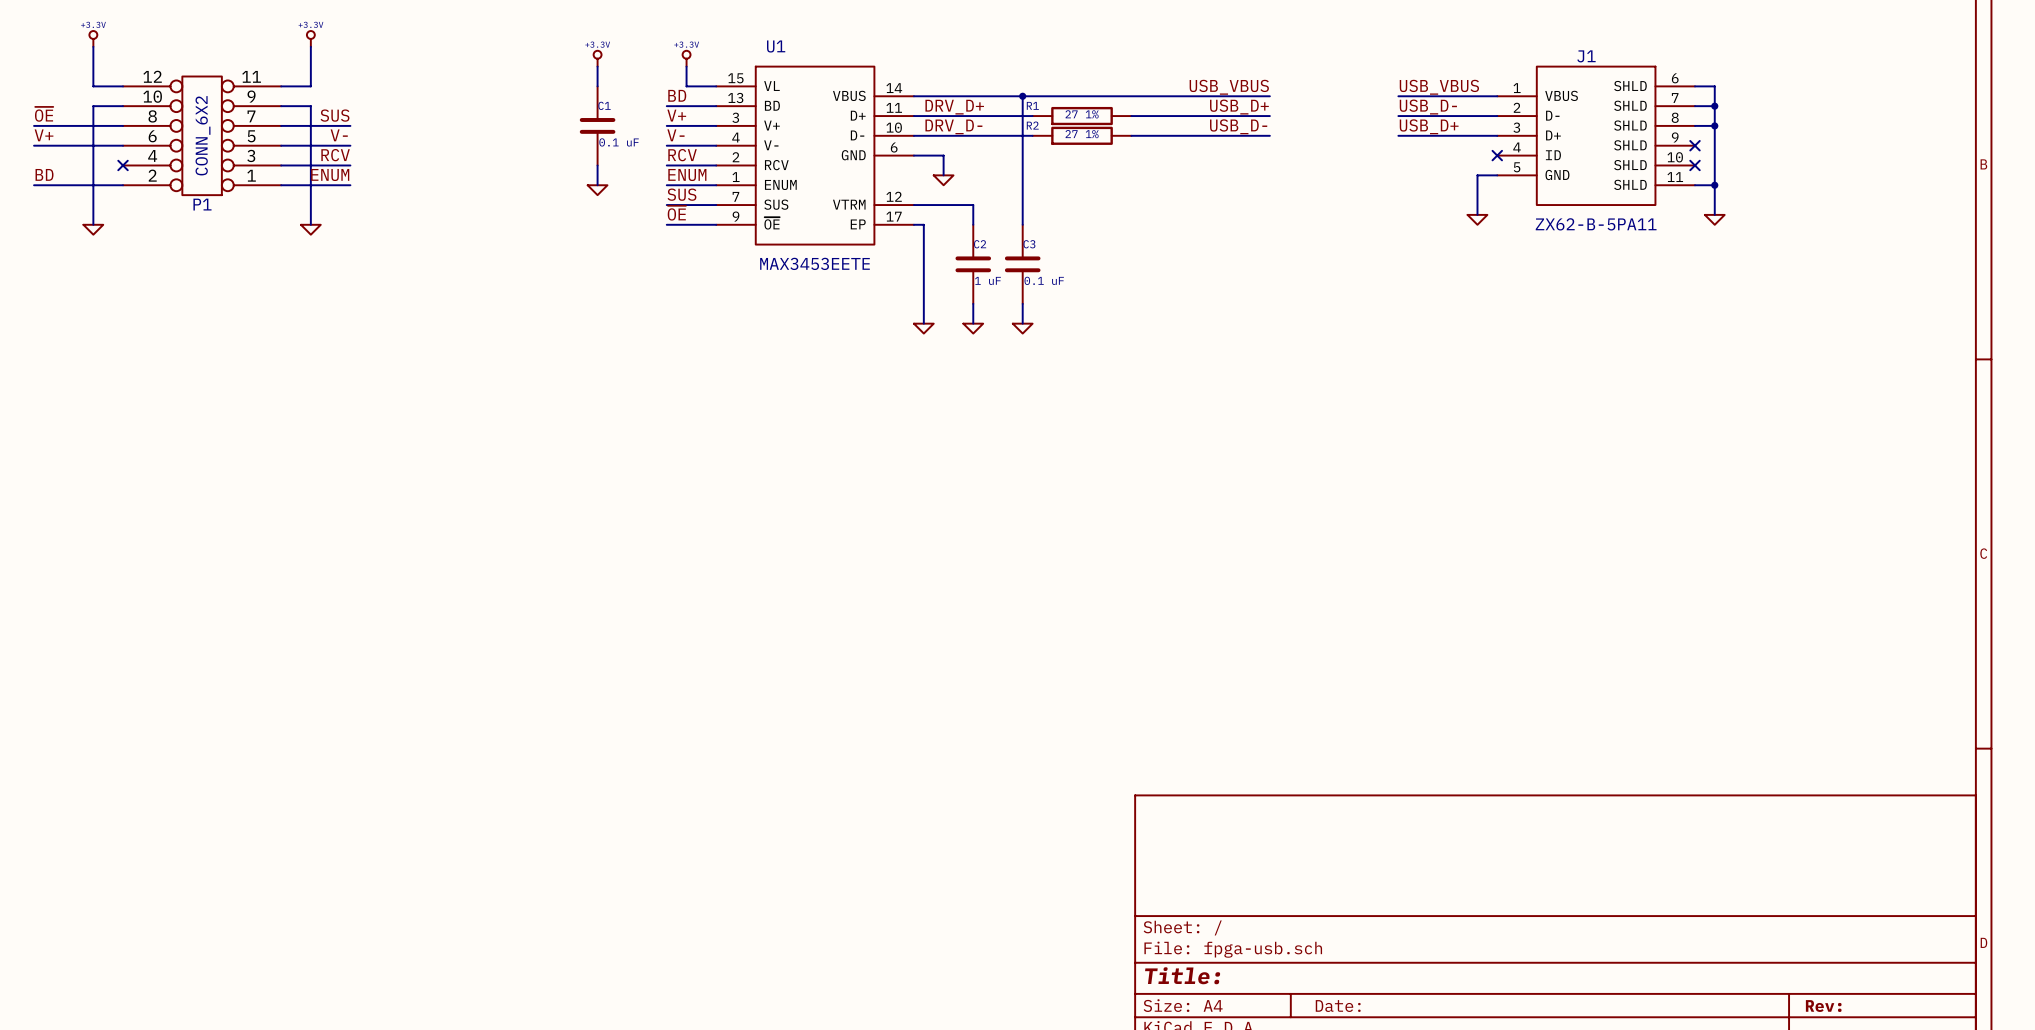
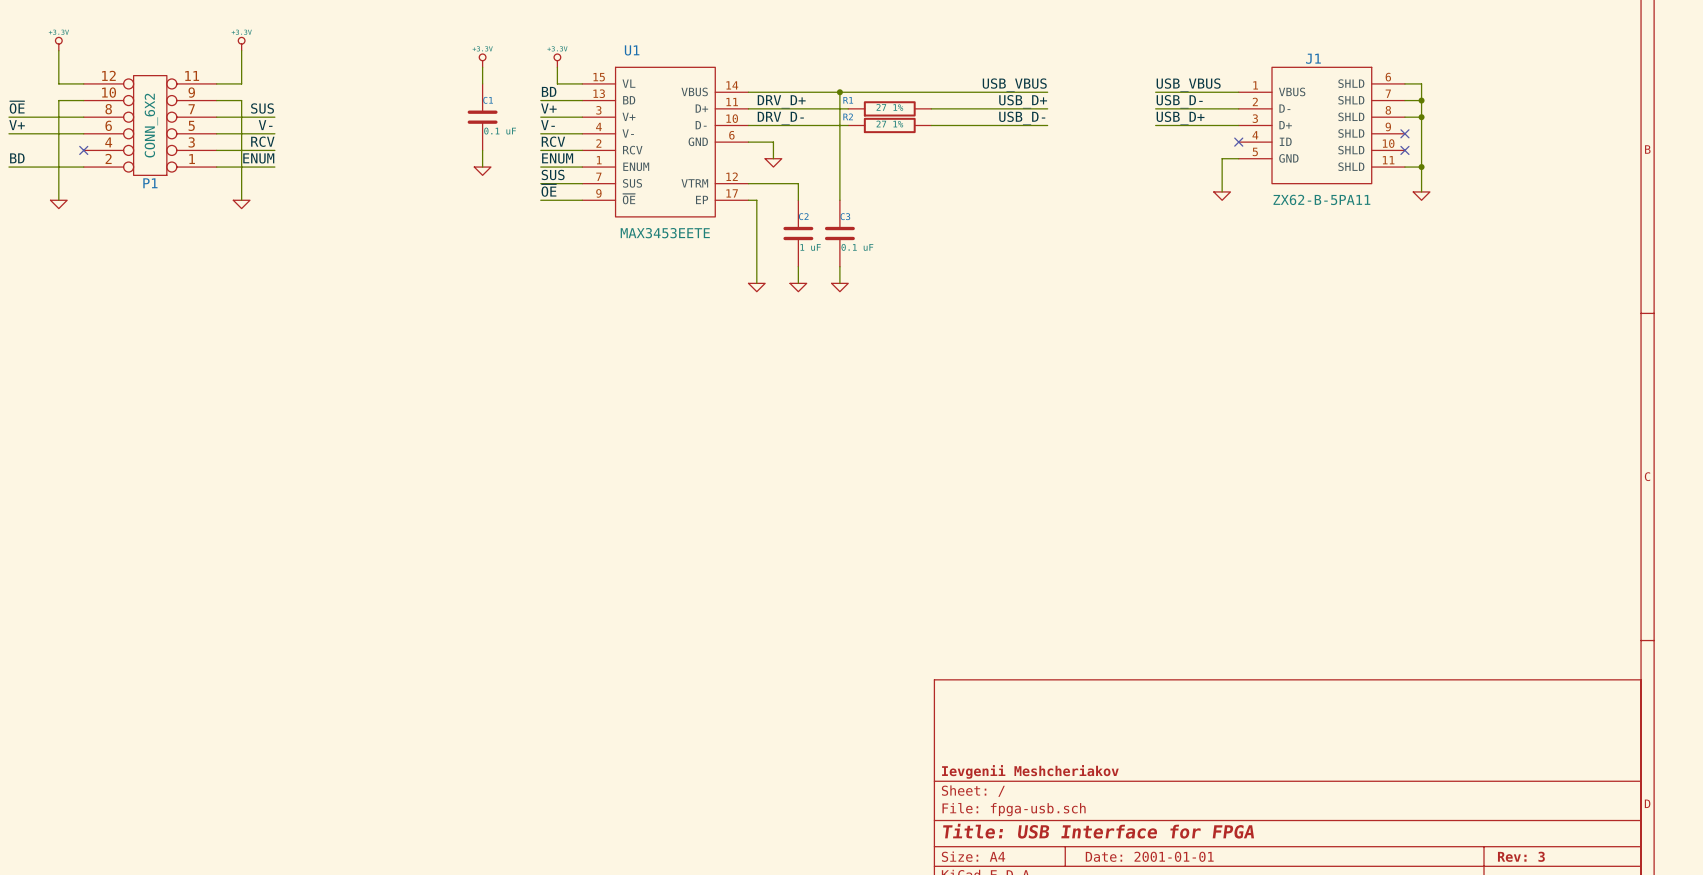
title block: none -> Ievgenii Meshcheriakov (1030, 771)
title block: Title: (1182, 975) -> Title: USB Interface for FPGA (1098, 831)
title block: Date: (1338, 1006) -> Date: 2001-01-01 (1149, 856)
title block: Rev: (1823, 1006) -> Rev: 3 (1521, 856)

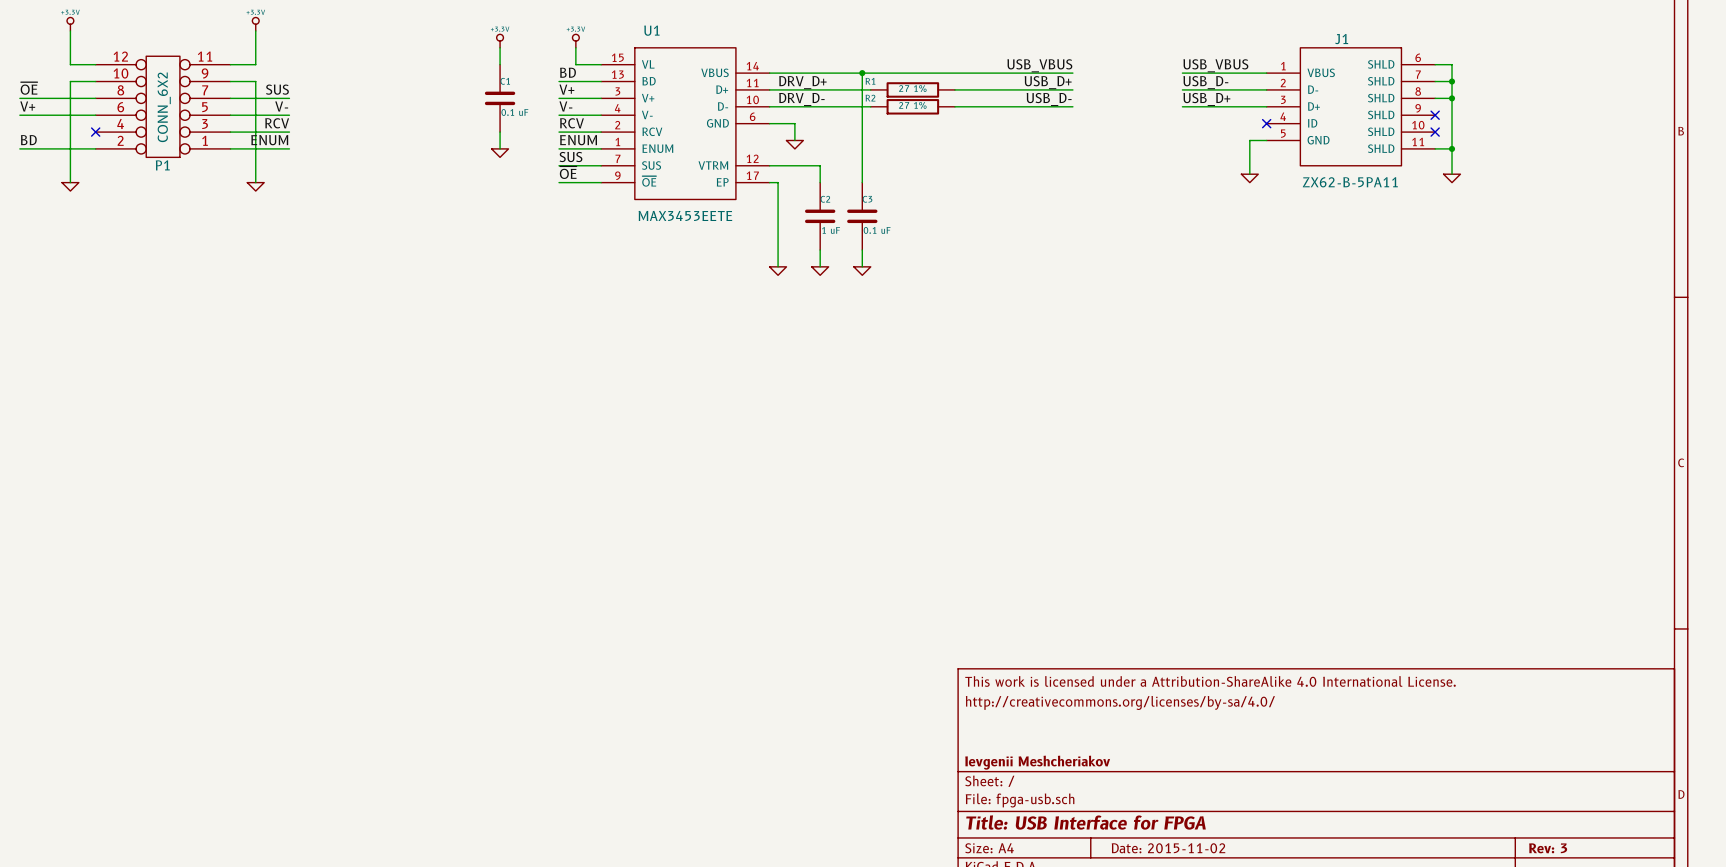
title block: none -> This work is licensed under a Attribution-ShareAlike 4.0 International License. (1210, 681)
title block: none -> http://creativecommons.org/licenses/by-sa/4.0/ (1120, 702)
title block: Date: 2001-01-01 (1149, 856) -> Date: 2015-11-02 (1168, 848)

